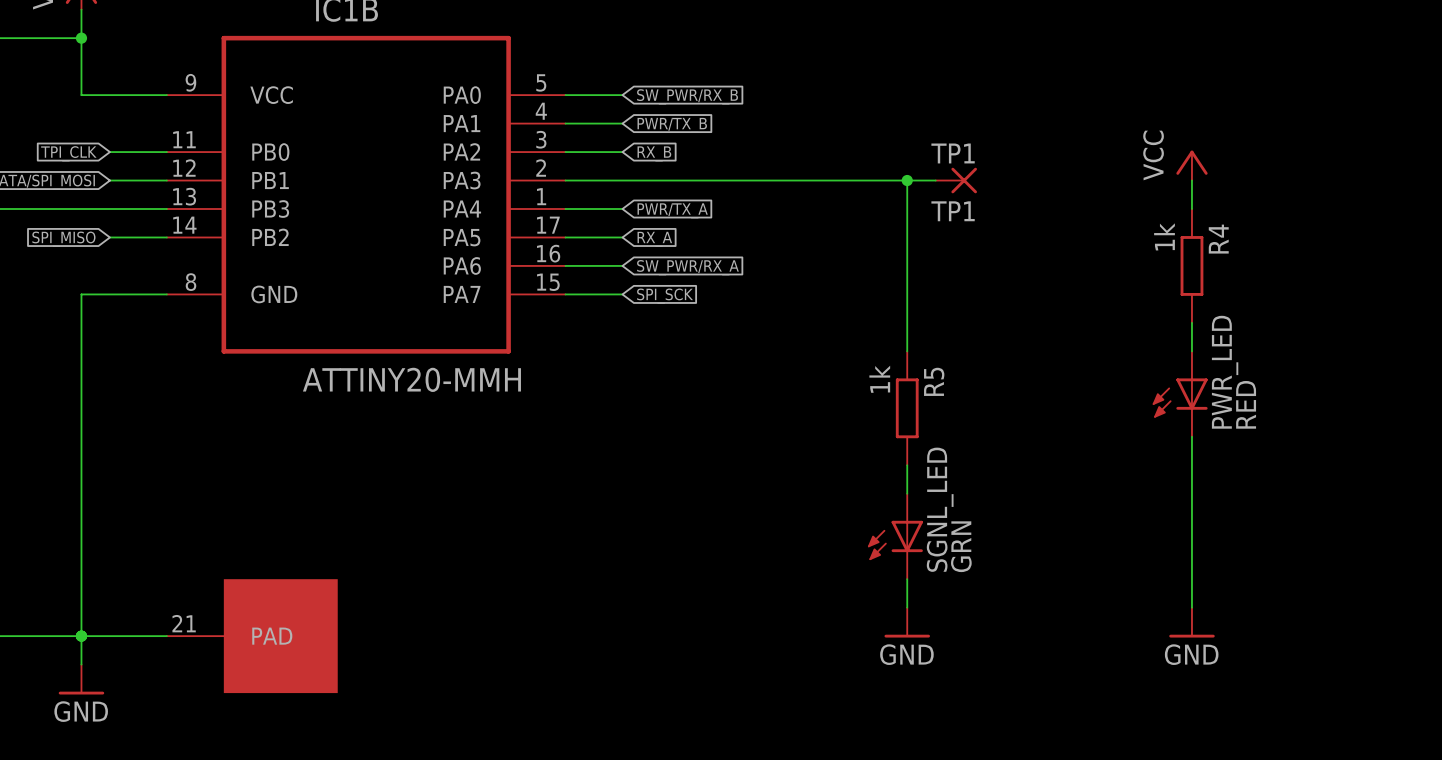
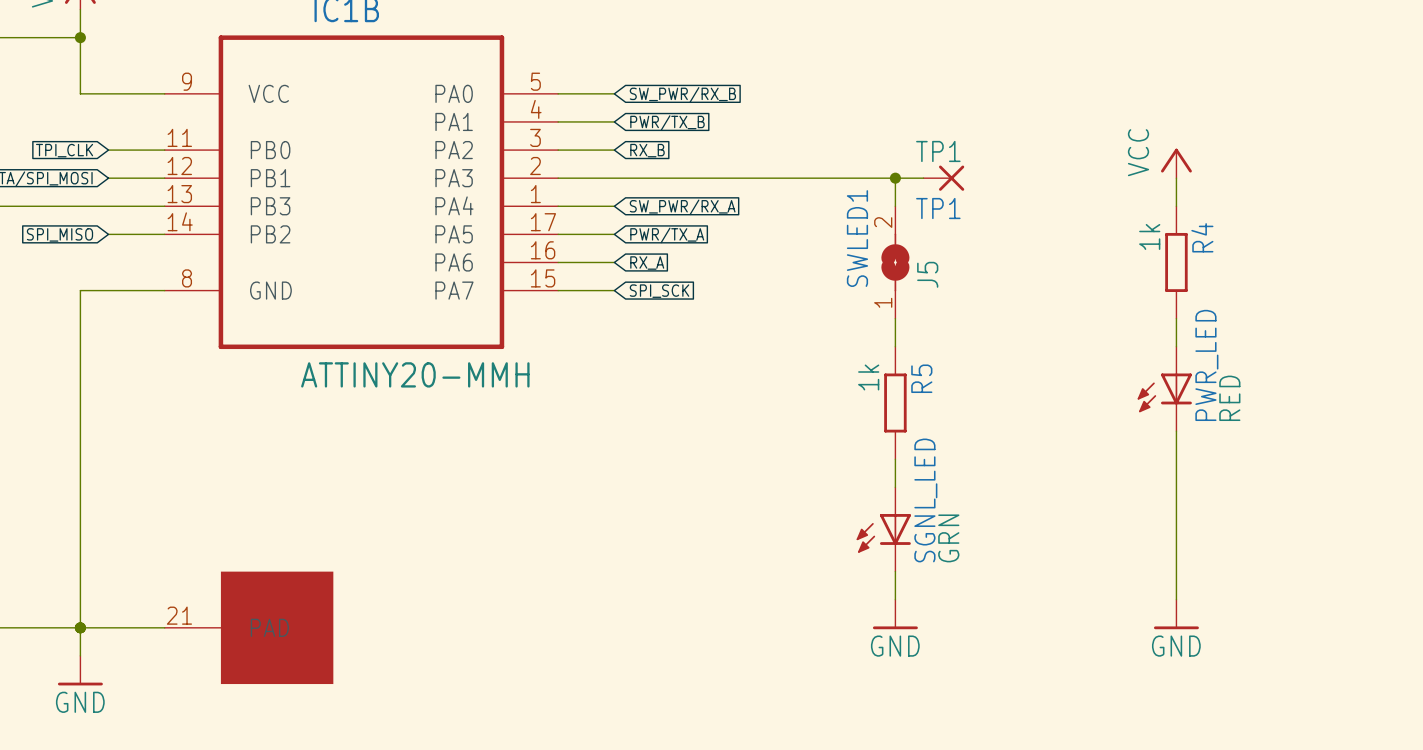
global label: PWR/TX_A (672, 210) -> SW_PWR/RX_A (682, 207)
global label: RX_A (654, 239) -> PWR/TX_A (667, 235)
SWLED1: none -> J5 (895, 262)
global label: SW_PWR/RX_A (687, 267) -> RX_A (647, 263)

